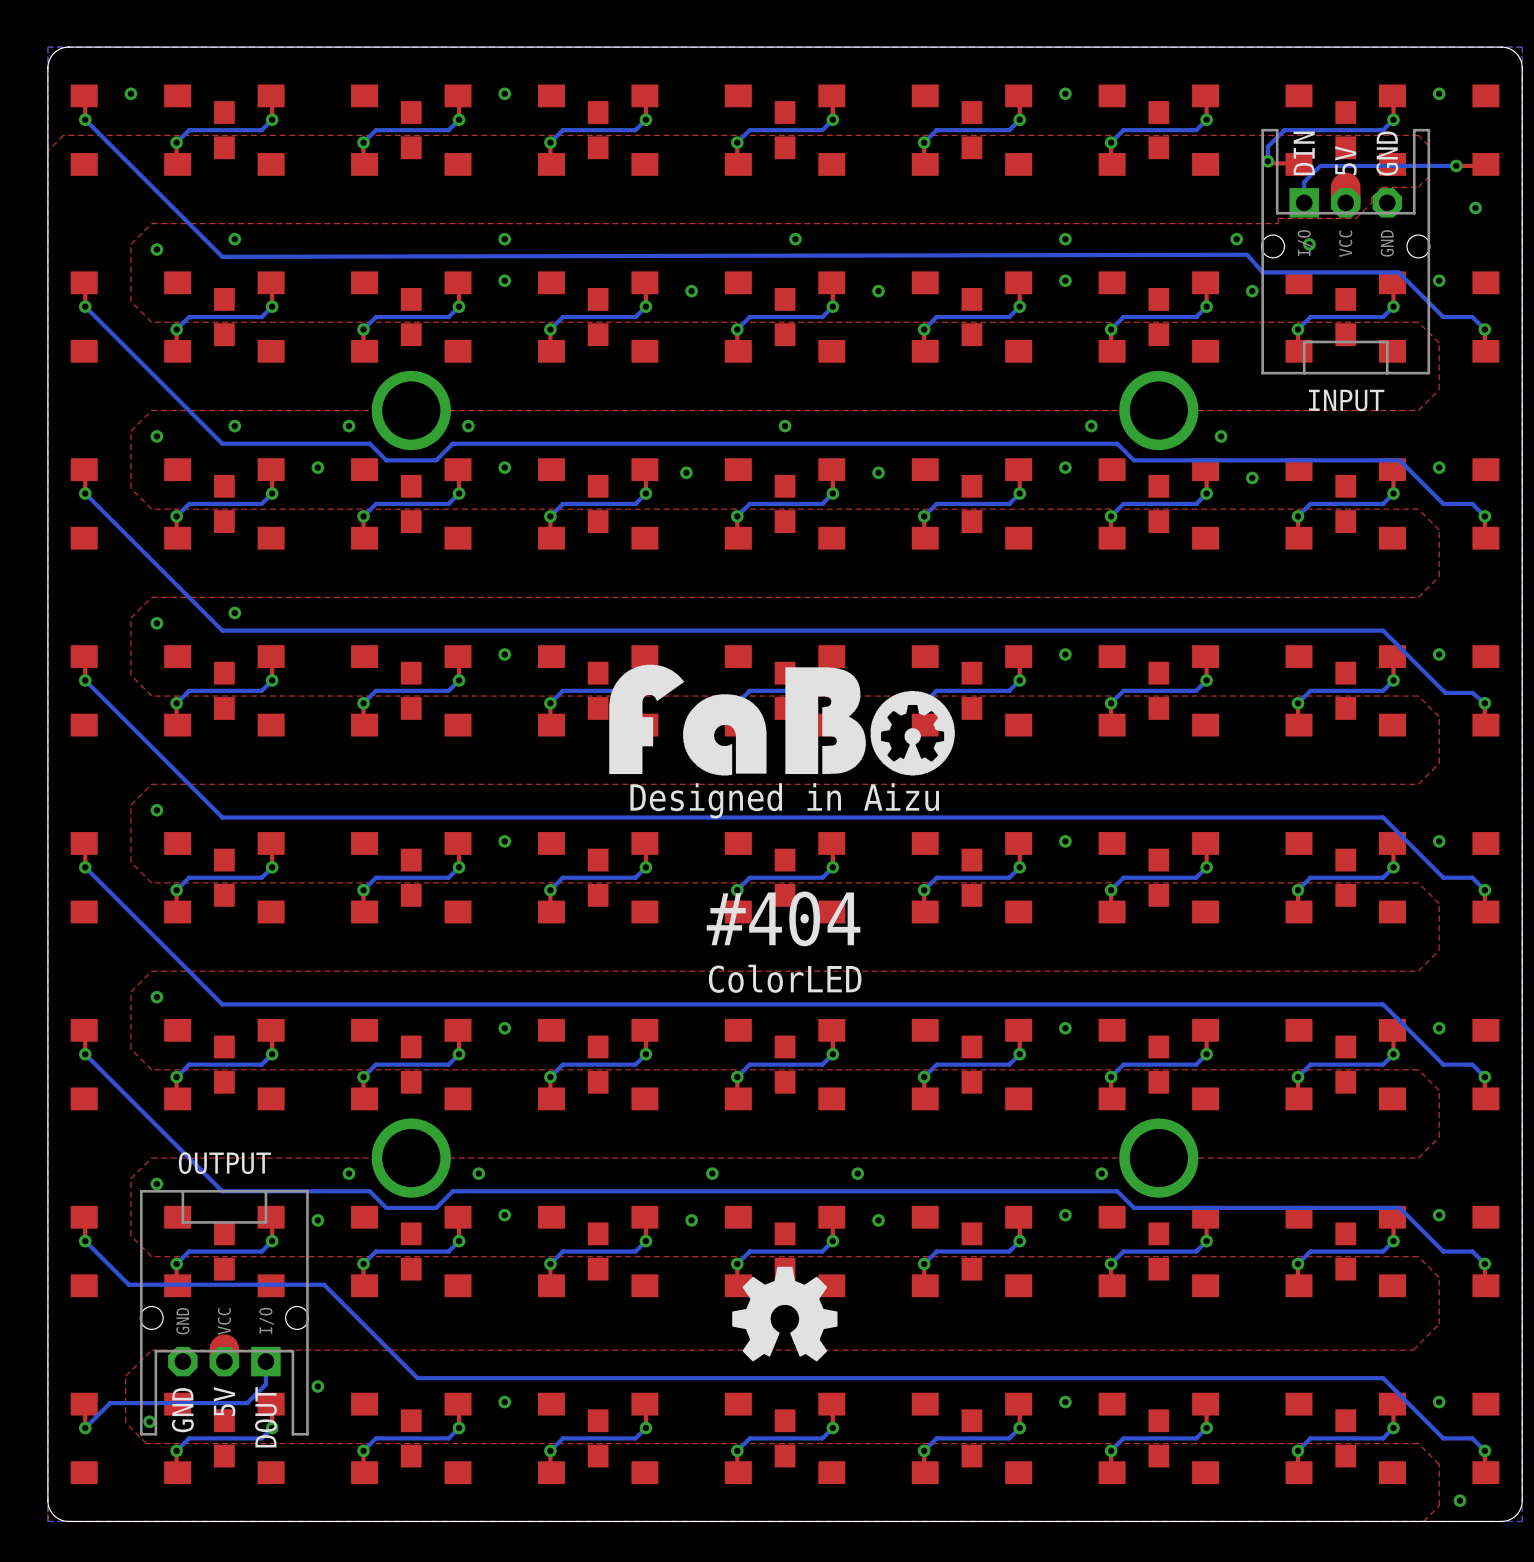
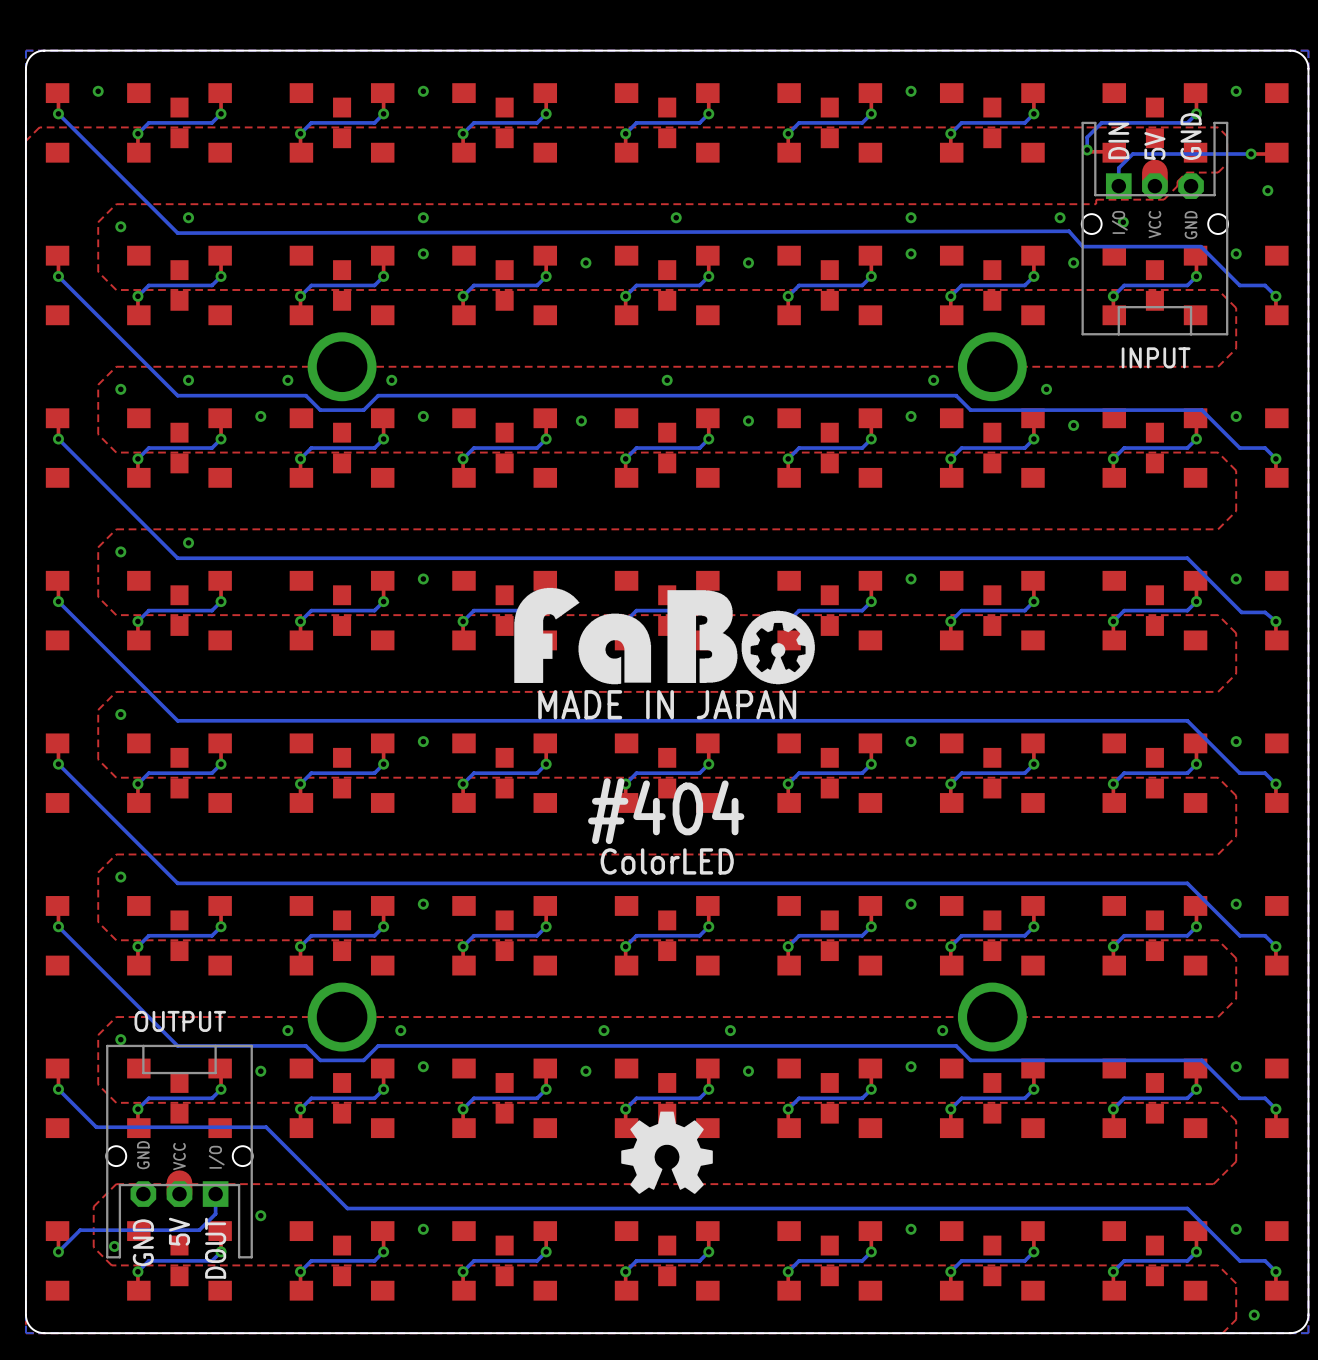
text: Designed in Aizu (784, 800) -> MADE IN JAPAN (667, 704)

